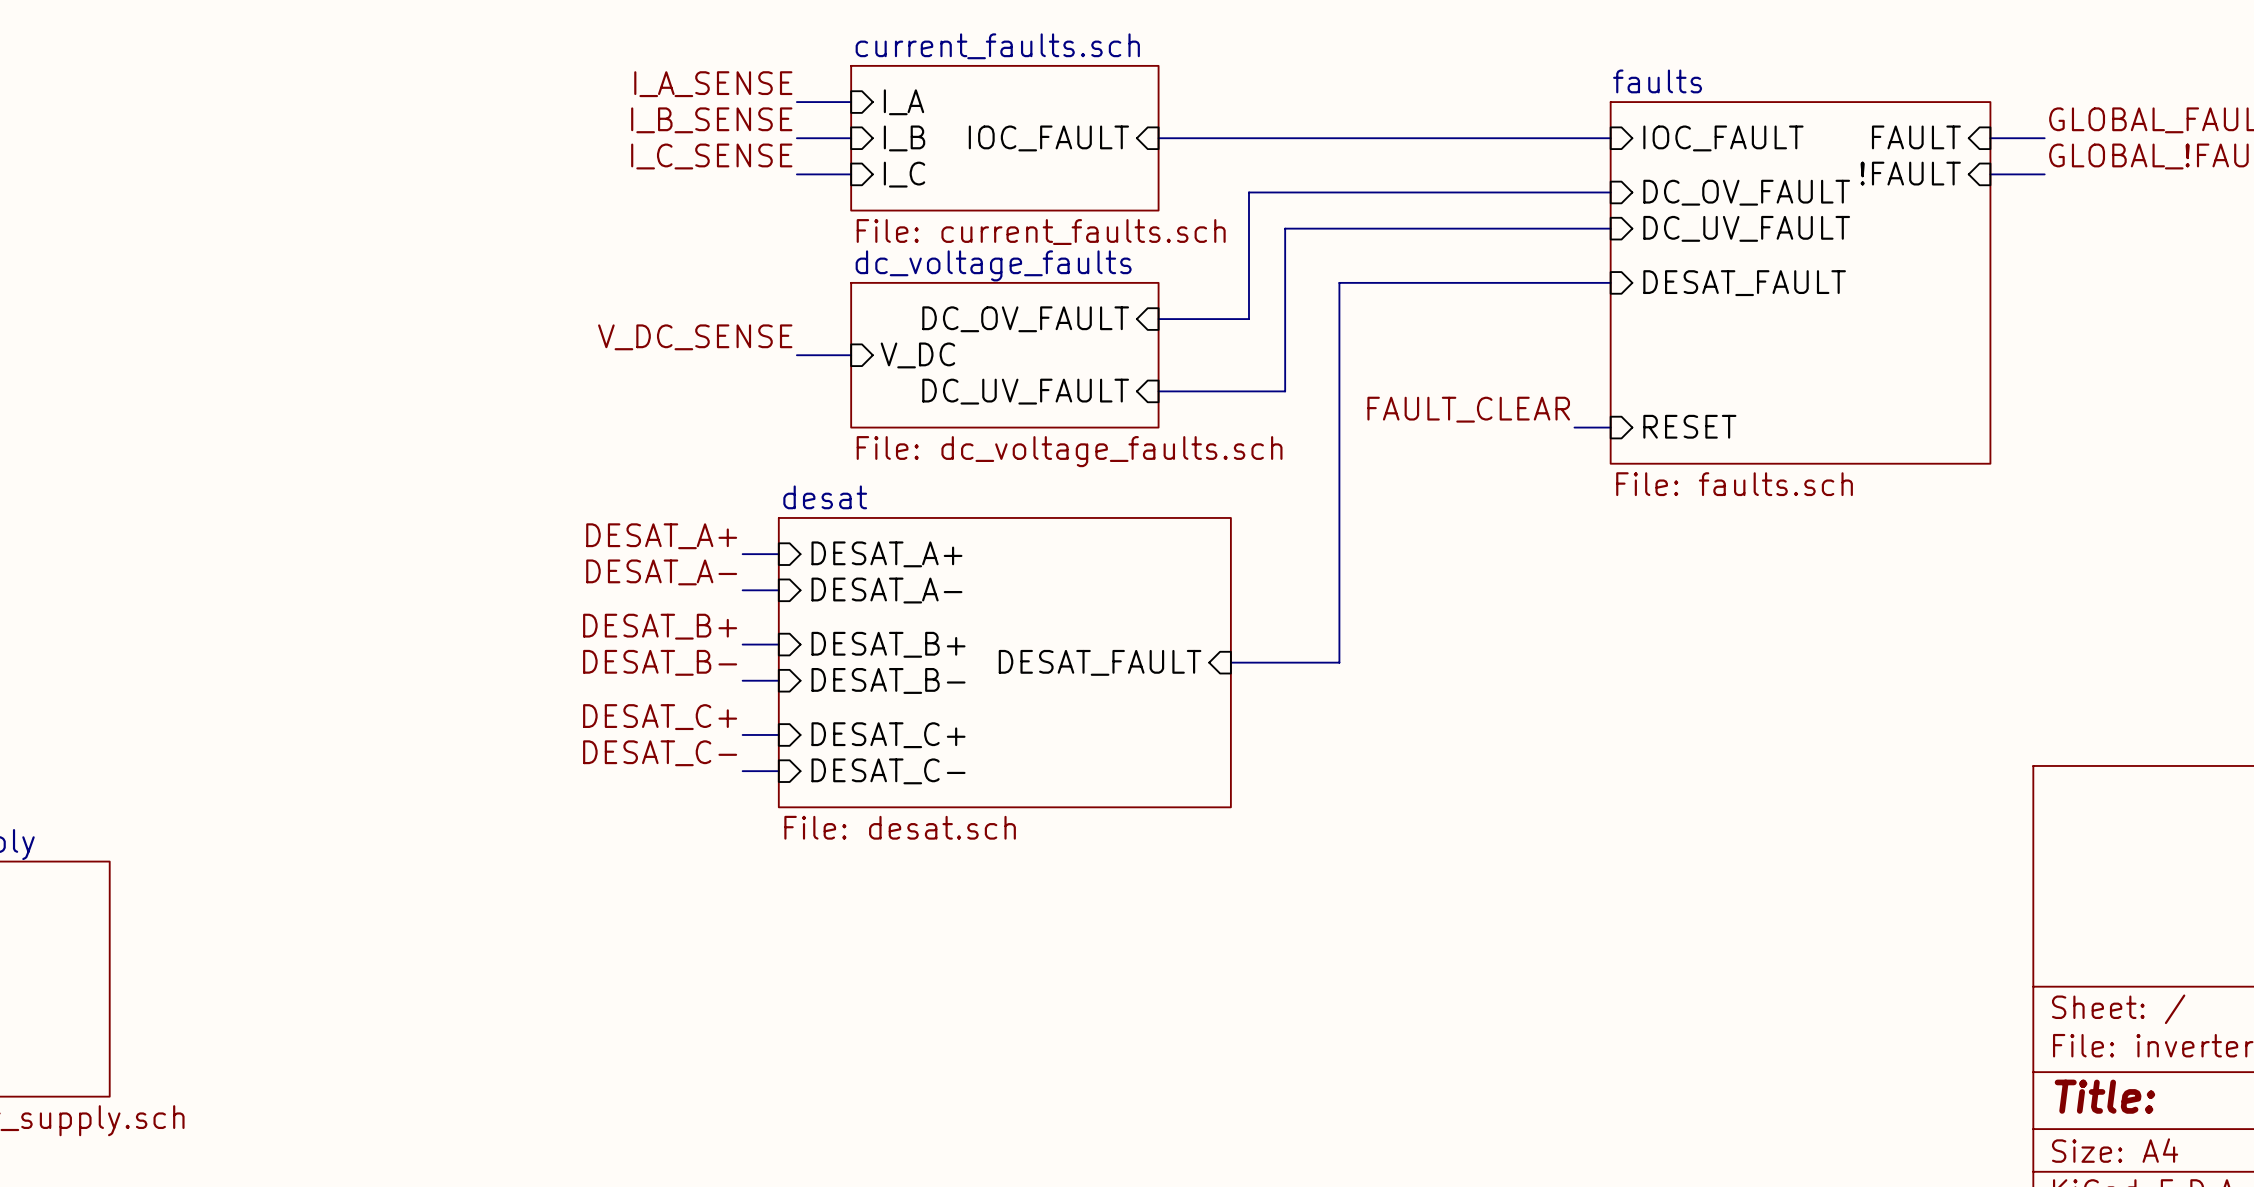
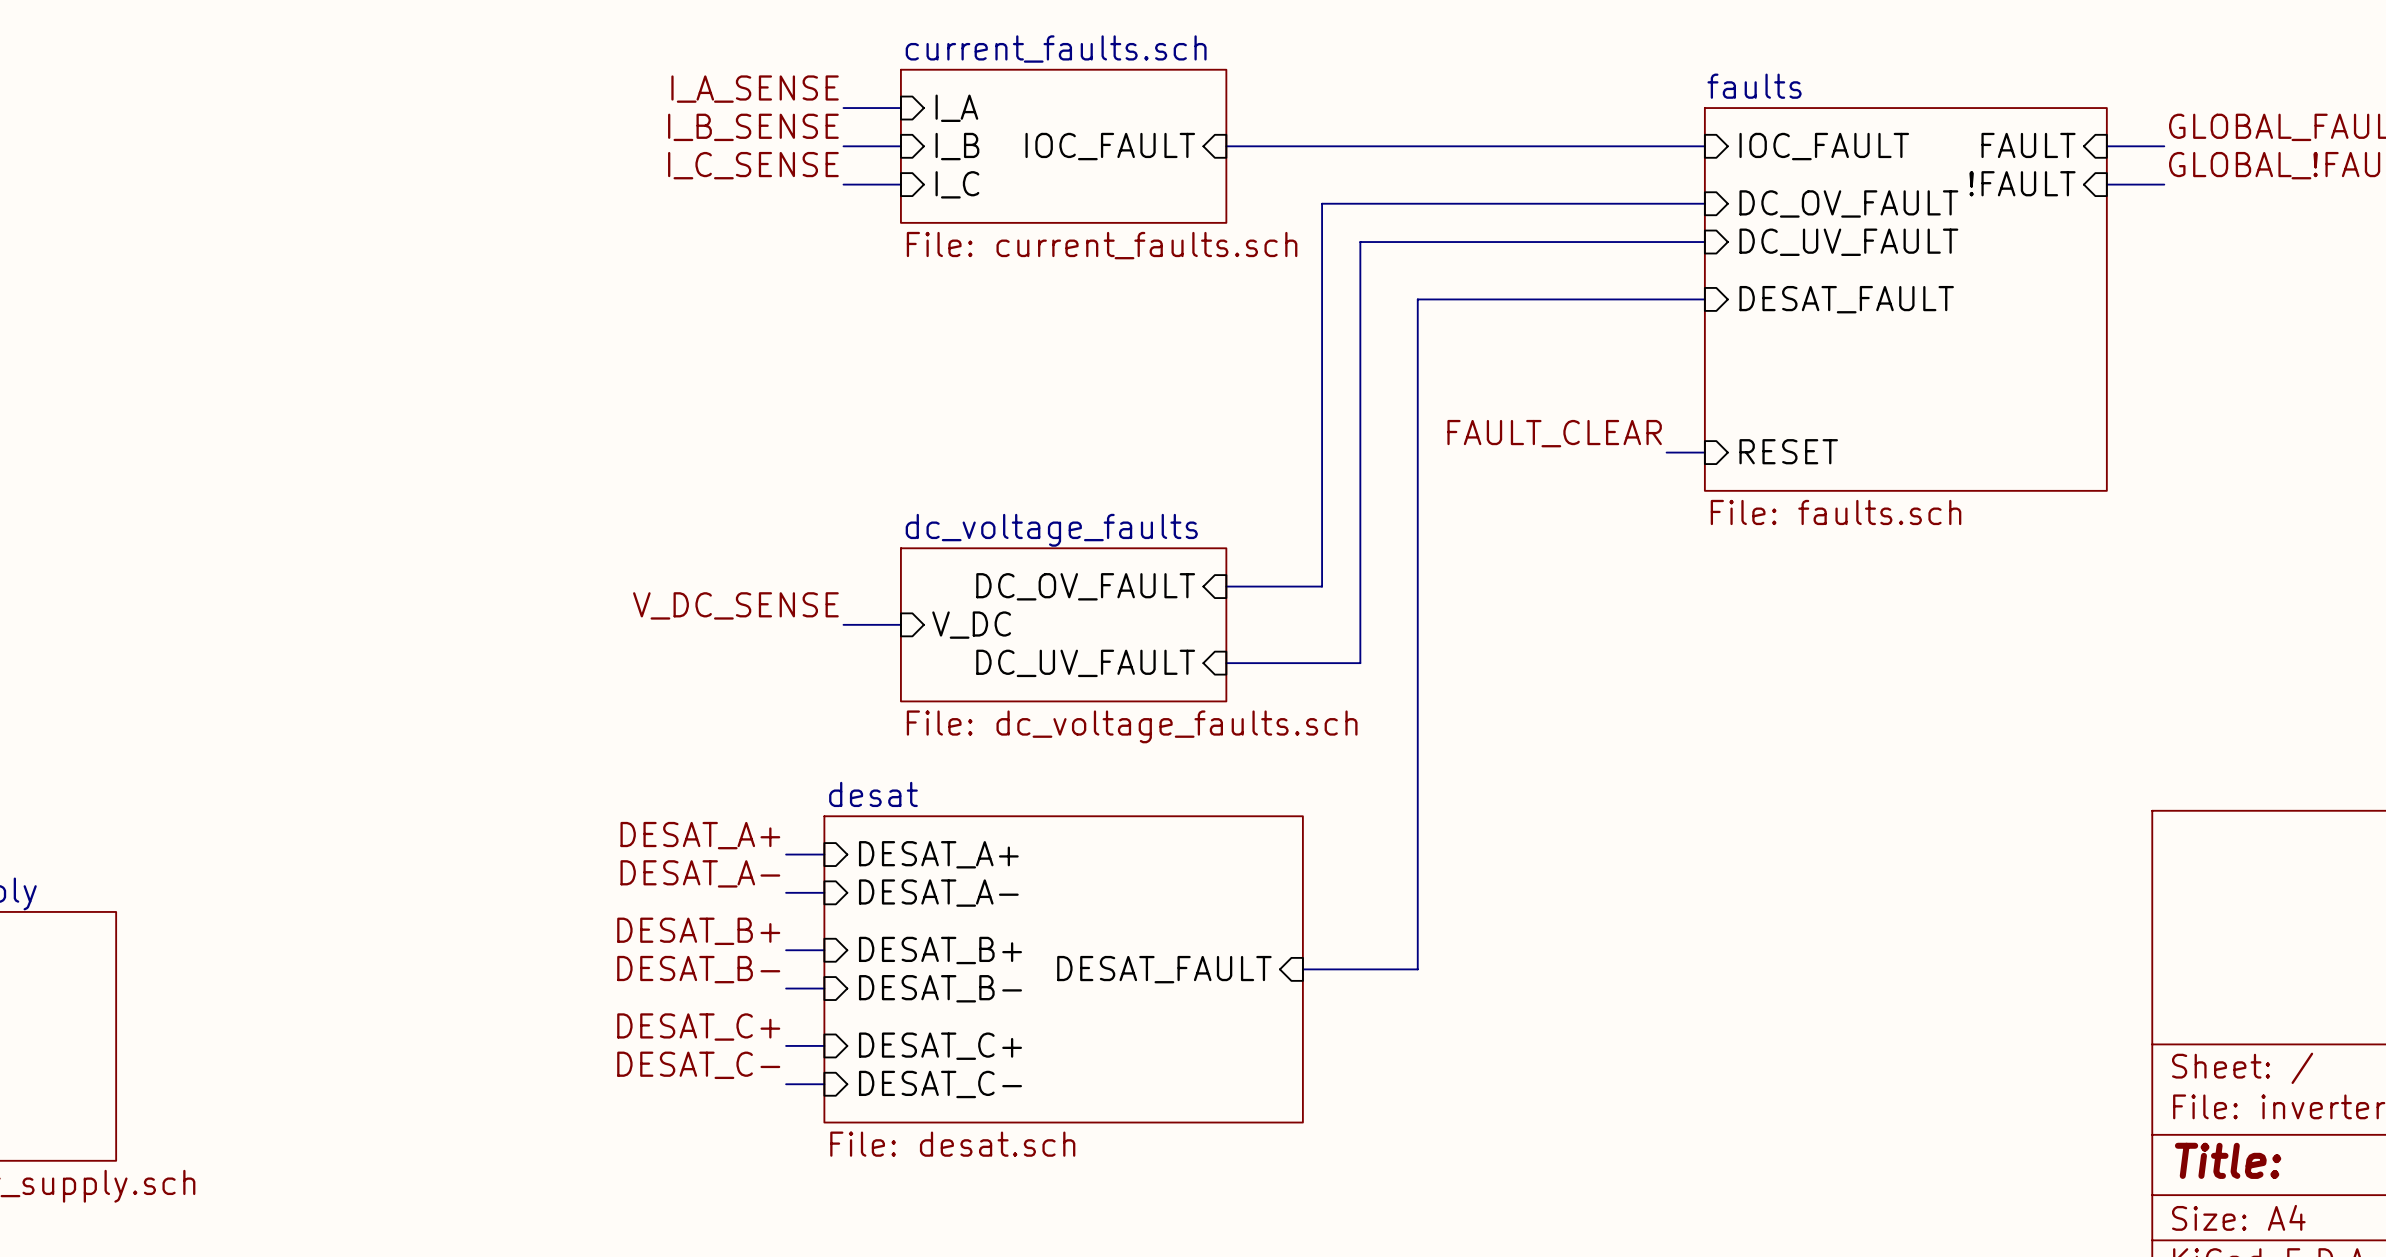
sheet pin position: DC_OV_FAULT (1025, 319) -> DC_OV_FAULT (1085, 586)
wire: (1158, 319) (1248, 319) -> (1226, 586) (1322, 586) (1322, 337)
label position: V_DC_SENSE (695, 337) -> V_DC_SENSE (735, 605)
wire: (796, 355) (851, 355) -> (843, 624) (900, 624)
sheet pin position: V_DC (917, 355) -> V_DC (971, 625)
sheet dc_voltage_faults position: (1004, 355) -> (1063, 624)
sheet pin position: DC_UV_FAULT (1025, 391) -> DC_UV_FAULT (1085, 663)
wire: (1158, 391) (1285, 391) -> (1226, 663) (1360, 663) (1360, 414)
label position: DESAT_A+ (661, 536) -> DESAT_A+ (700, 835)
wire: (742, 554) (778, 554) -> (786, 854) (824, 854)
sheet pin position: DESAT_A+ (886, 554) -> DESAT_A+ (938, 854)
label position: DESAT_A- (661, 572) -> DESAT_A- (700, 873)
wire: (742, 590) (778, 590) -> (786, 892) (824, 892)
sheet pin position: DESAT_A- (886, 590) -> DESAT_A- (938, 893)
label position: DESAT_B+ (660, 626) -> DESAT_B+ (698, 931)
wire: (742, 644) (778, 644) -> (786, 950) (824, 950)
sheet pin position: DESAT_B+ (888, 644) -> DESAT_B+ (940, 950)
label position: DESAT_B- (660, 662) -> DESAT_B- (698, 969)
sheet desat position: (1004, 662) -> (1063, 969)
sheet pin position: DESAT_FAULT (1100, 662) -> DESAT_FAULT (1164, 969)
wire: (1230, 662) (1339, 662) -> (1302, 969) (1417, 969) (1417, 701)
wire: (742, 680) (778, 680) -> (786, 988) (824, 988)
sheet pin position: DESAT_B- (888, 680) -> DESAT_B- (940, 988)
label position: DESAT_C+ (660, 717) -> DESAT_C+ (698, 1027)
wire: (742, 734) (778, 734) -> (786, 1045) (824, 1045)
sheet pin position: DESAT_C+ (888, 735) -> DESAT_C+ (940, 1046)
label position: DESAT_C- (660, 753) -> DESAT_C- (698, 1065)
wire: (742, 771) (778, 771) -> (786, 1084) (824, 1084)
sheet pin position: DESAT_C- (888, 771) -> DESAT_C- (940, 1084)

